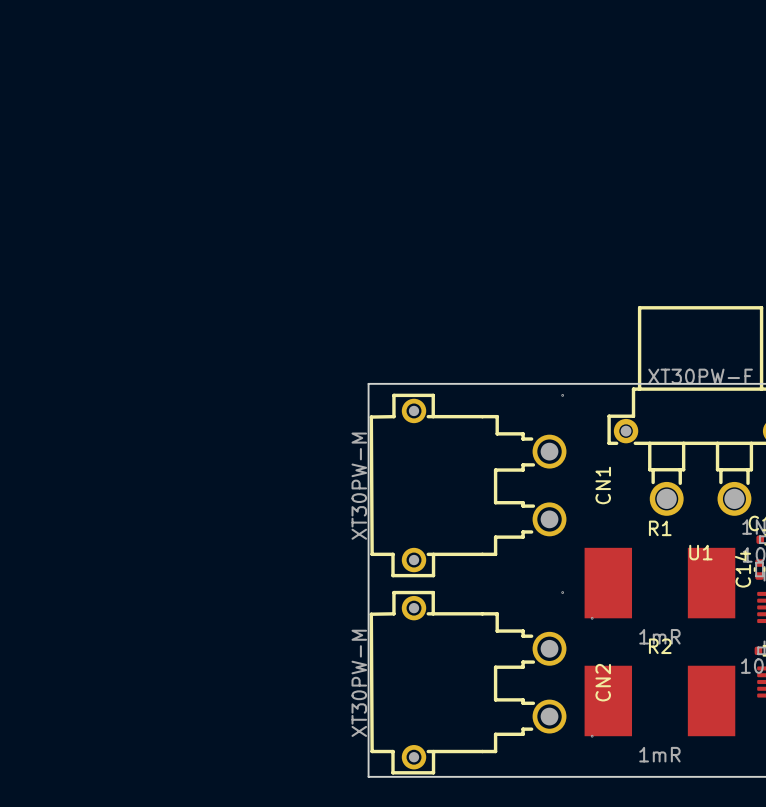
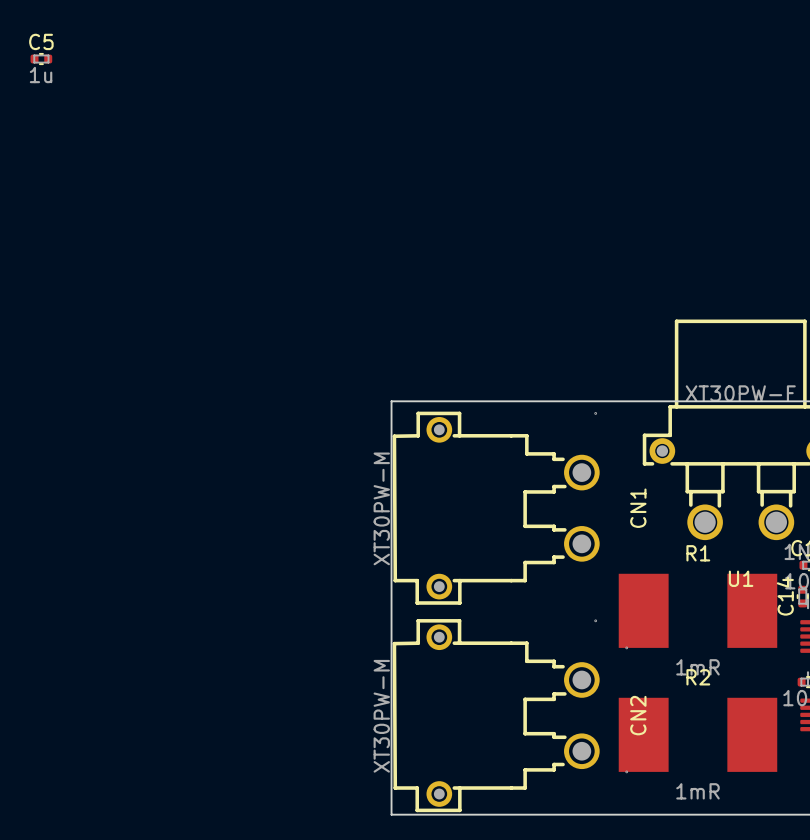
C5: none -> 1u (41, 59)

